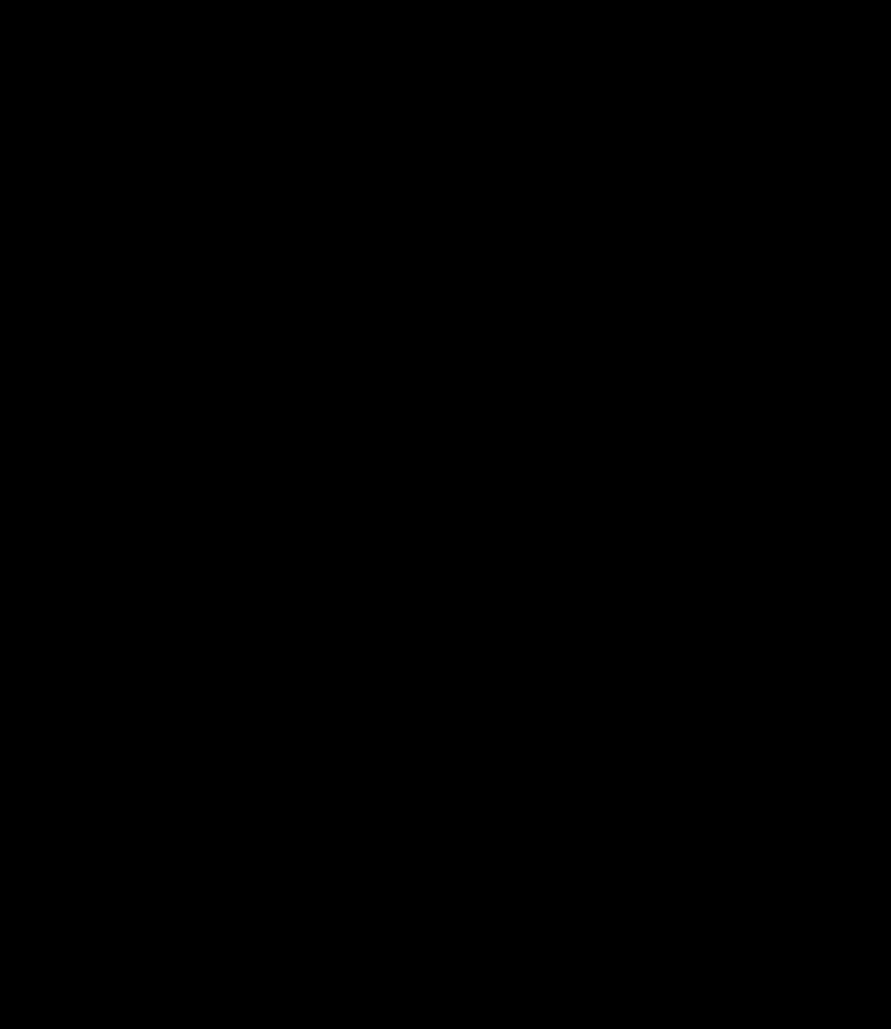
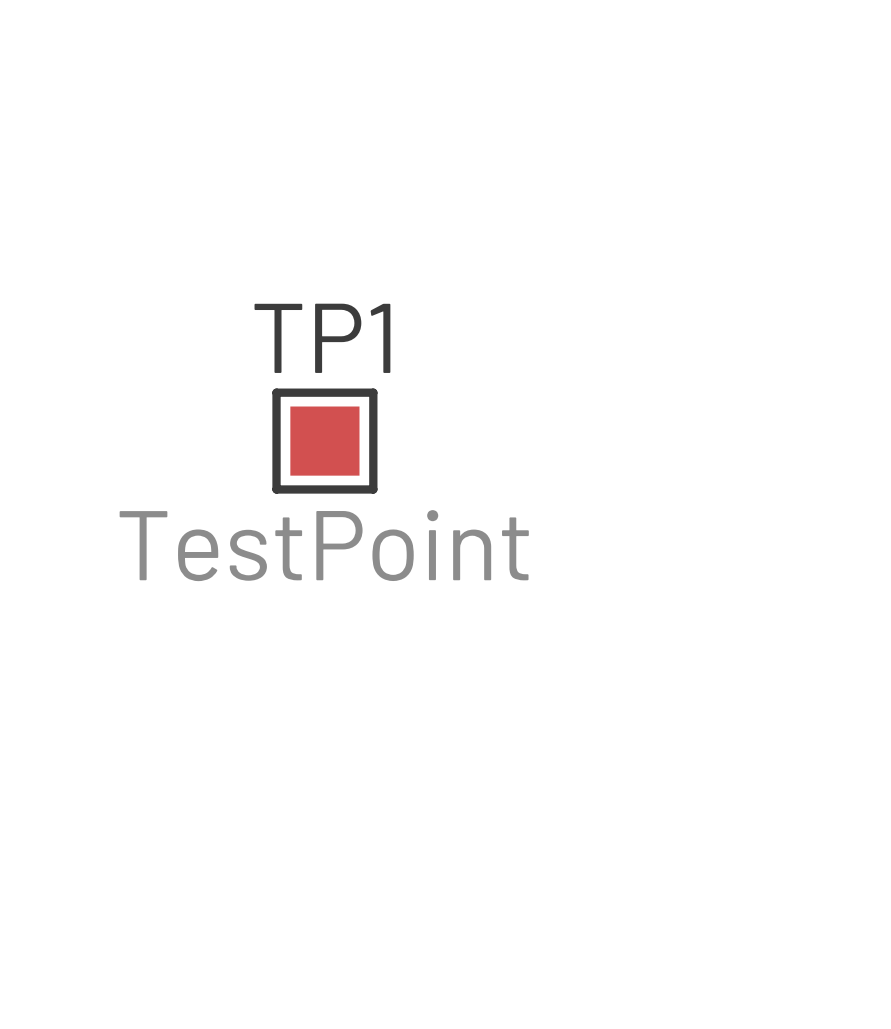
TP1: none -> TestPoint (324, 441)

